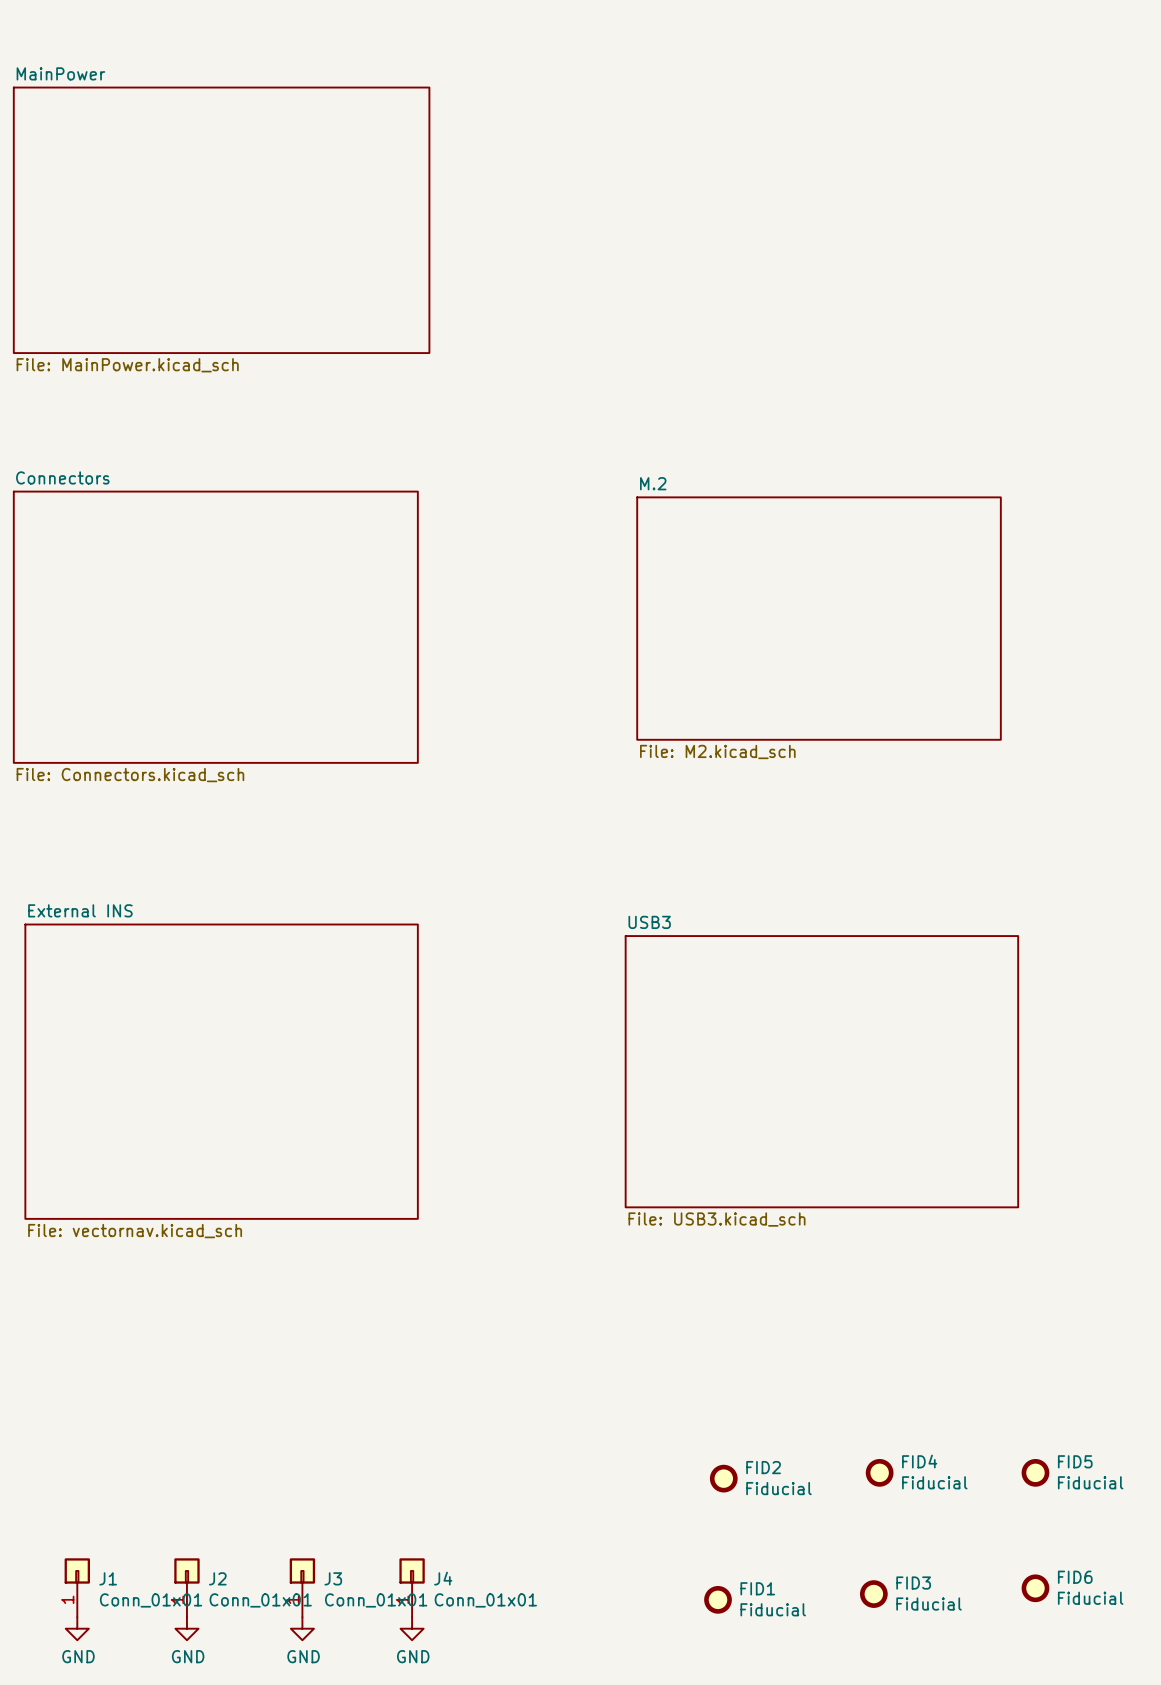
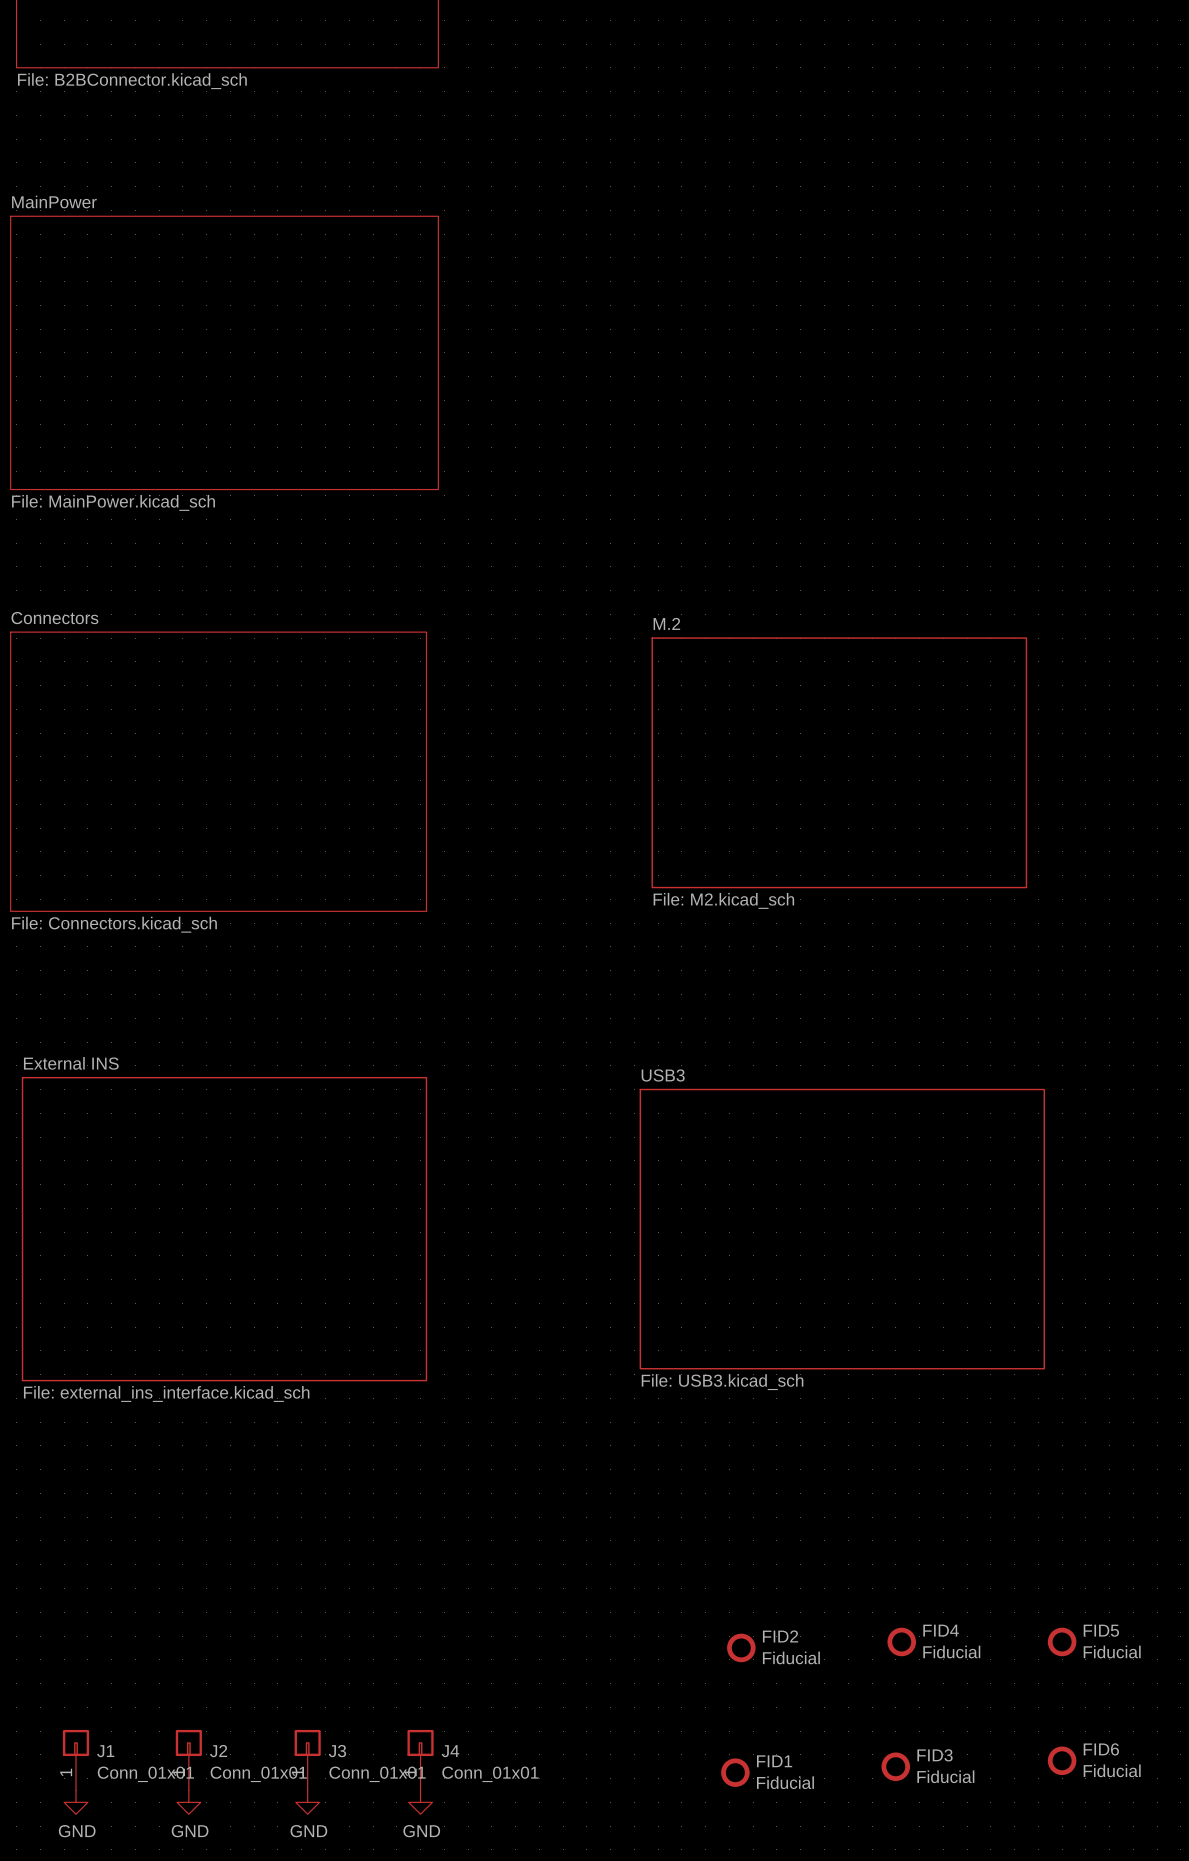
sheet External INS value: File: vectornav.kicad_sch (135, 1231) -> File: external_ins_interface.kicad_sch (166, 1393)

